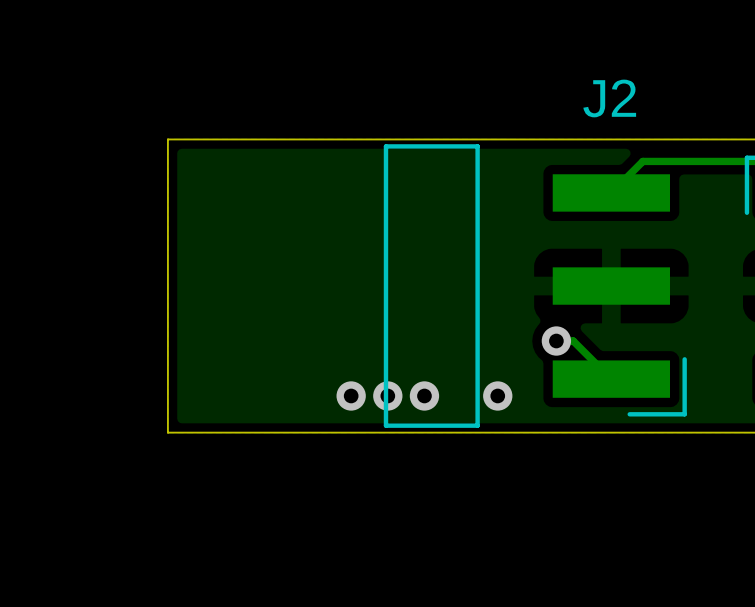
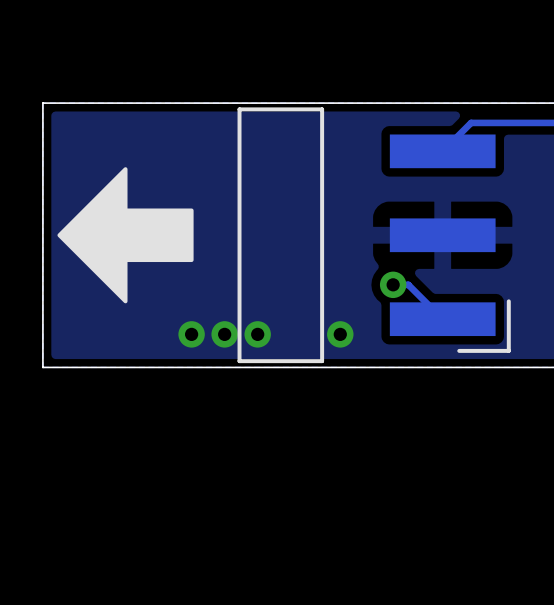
J2 name: J2 (609, 98) -> none
drawing: none -> [57, 167, 194, 304]
via: none -> (191, 334)
via: (351, 395) -> none
via: none -> (224, 334)
via: (387, 395) -> none
via: none -> (257, 334)
via: (424, 395) -> none

